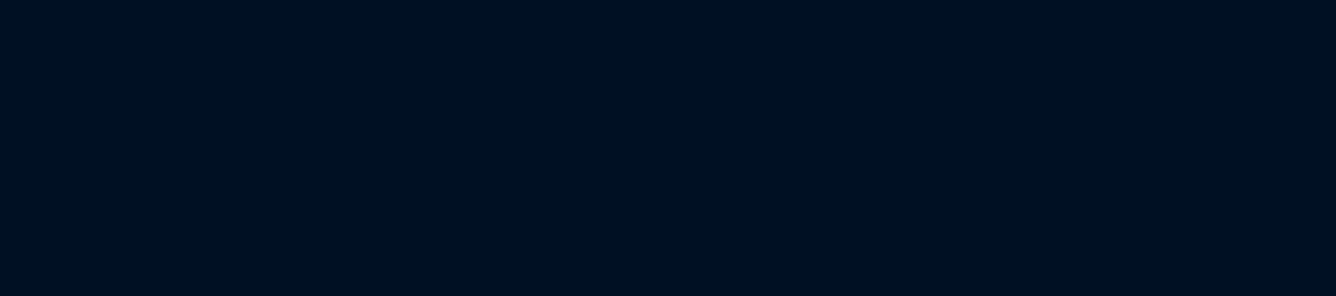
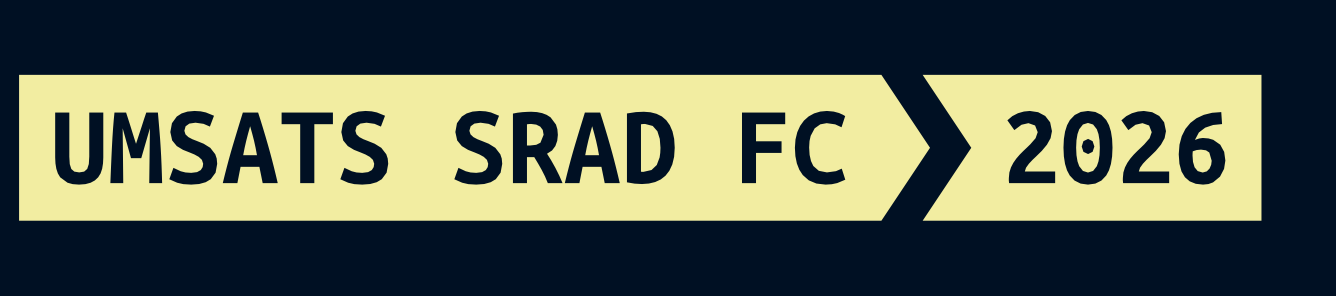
drawing: none -> [19, 74, 1262, 221]

